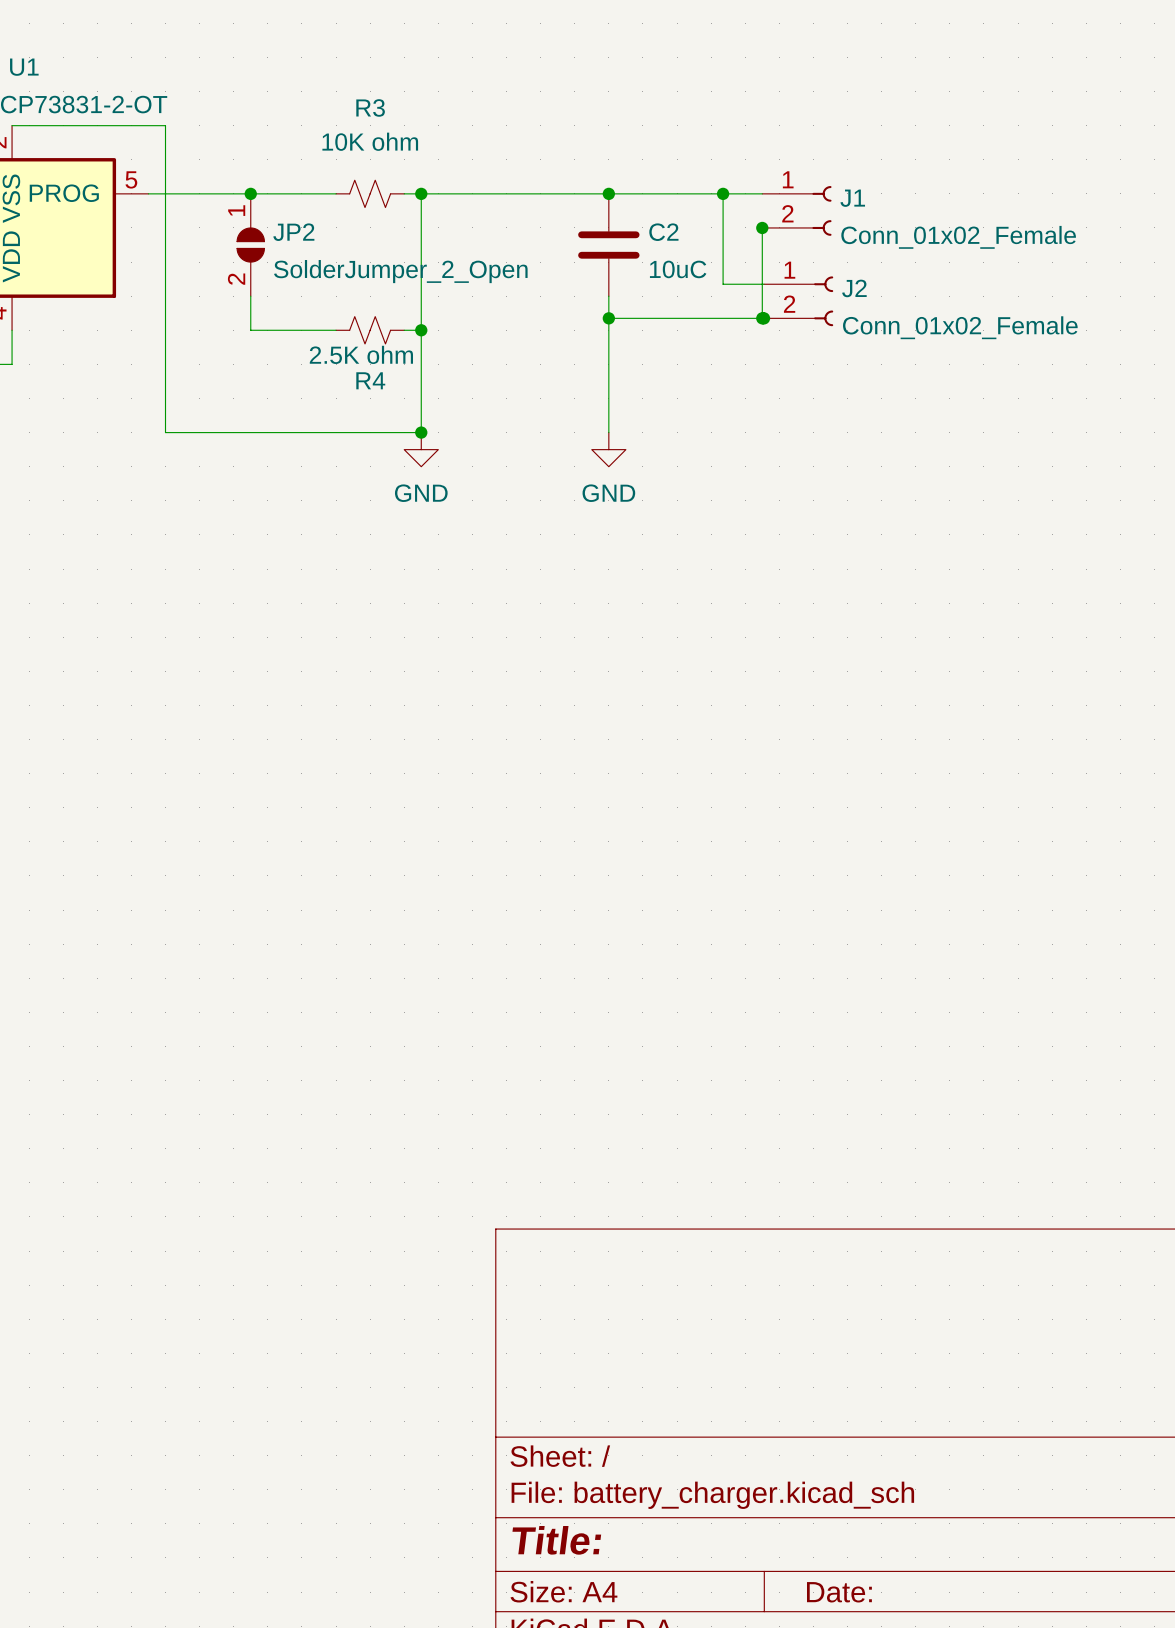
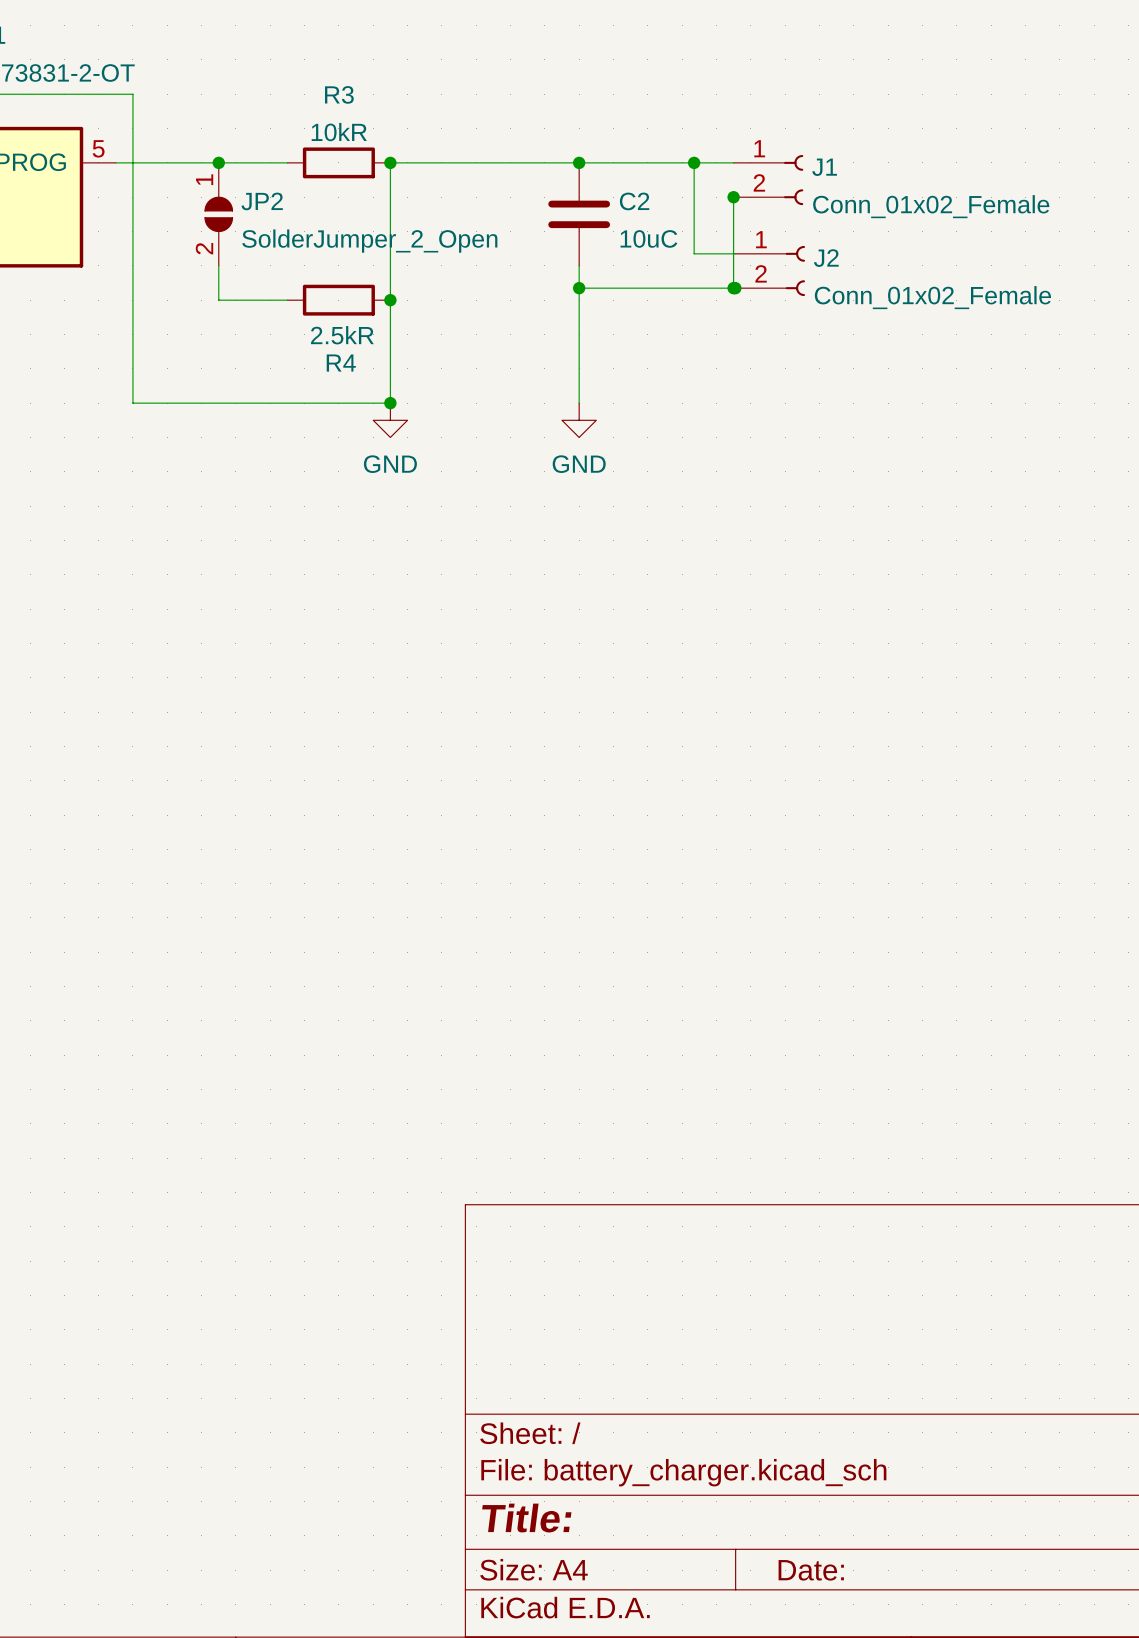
R3 value: 10K ohm (370, 141) -> 10kR (339, 132)
R3 symbol: [336, 180, 405, 208] -> [287, 147, 391, 179]
R4 symbol: [336, 316, 405, 344] -> [287, 284, 391, 316]
R4 value: 2.5K ohm (361, 354) -> 2.5kR (342, 335)

